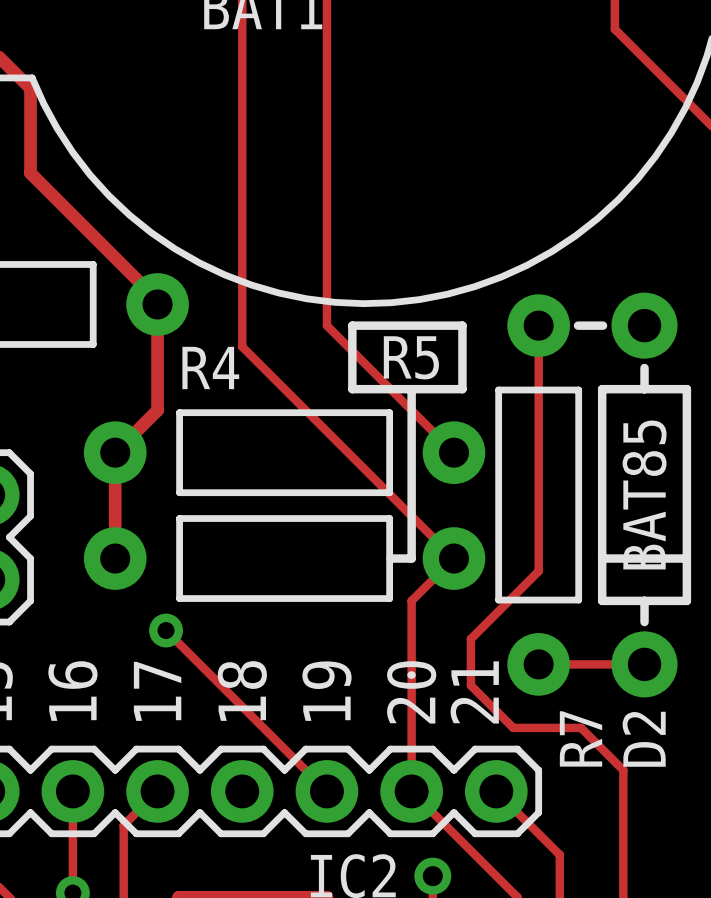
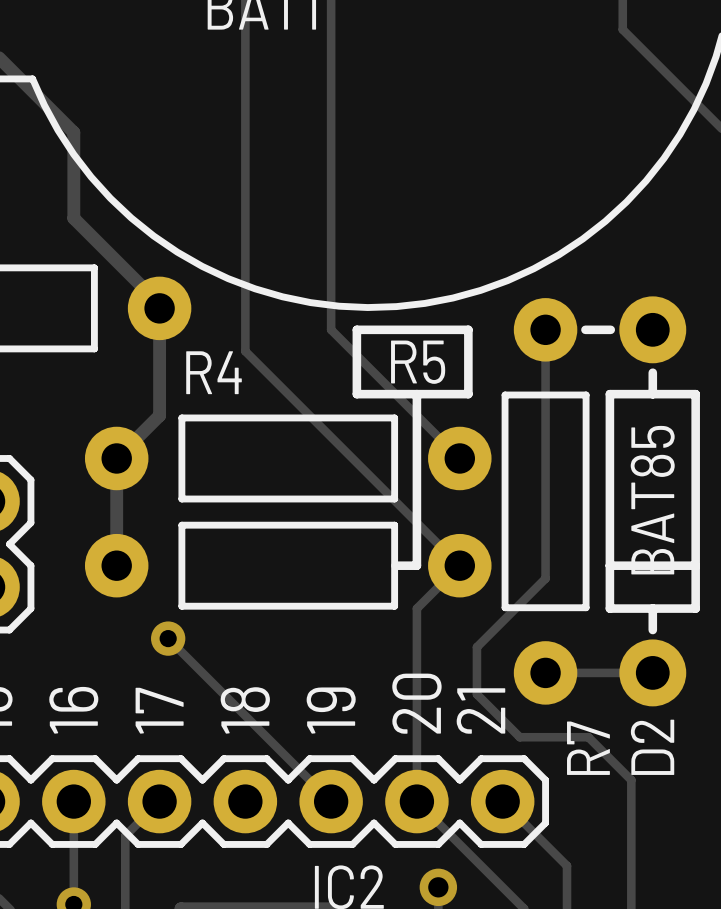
track: (30, 88) (30, 173) (72, 215) -> (30, 89) (73, 132) (73, 218)

